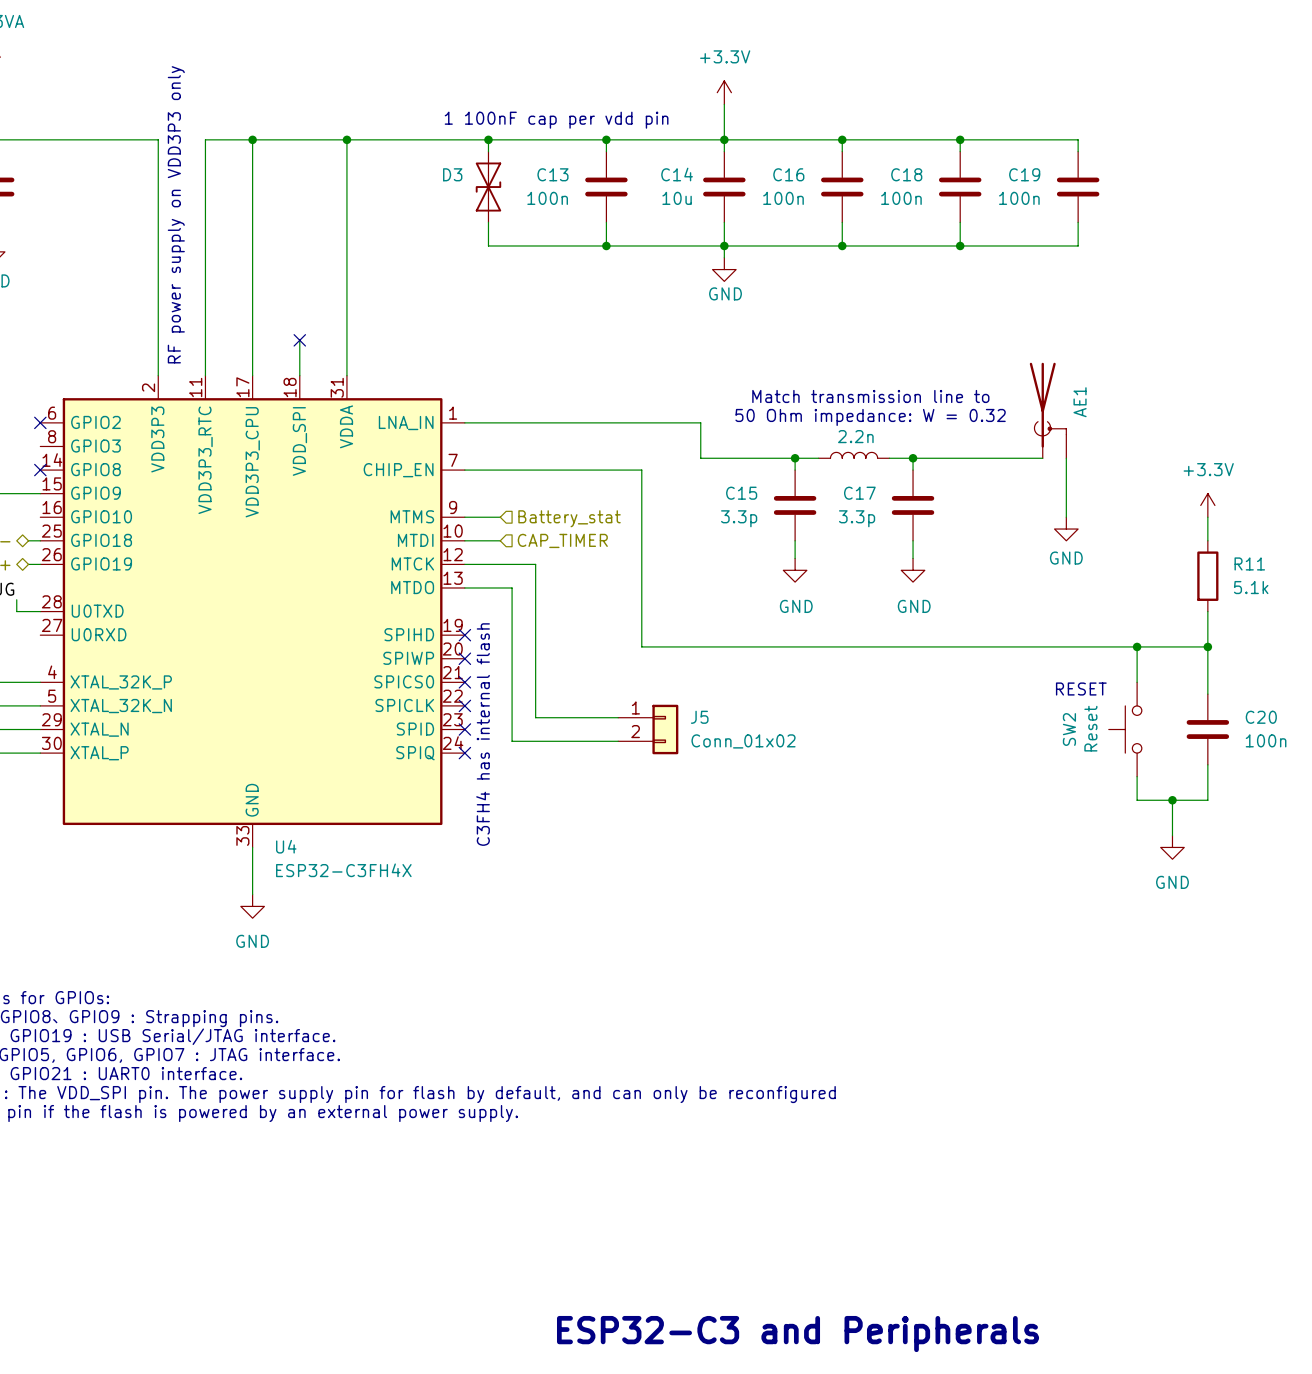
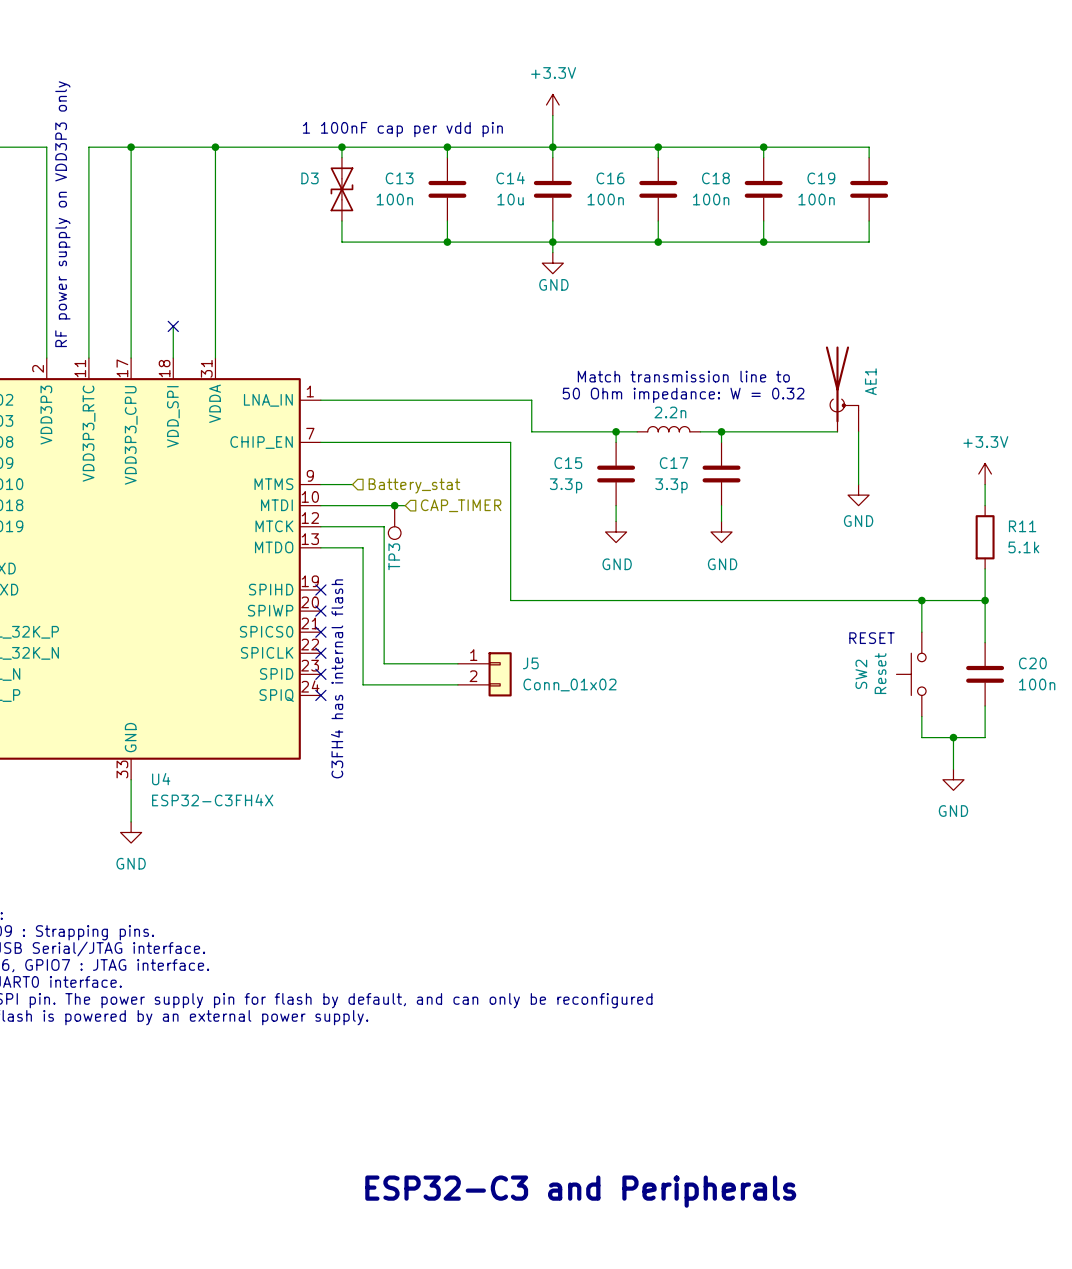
wire: (641, 470) (641, 646) (677, 646) -> (479, 442) (510, 442) (510, 600)
wire: none -> (352, 505) (405, 505)
junction: none -> (394, 505)
hierarchical label position: CAP_TIMER (562, 540) -> CAP_TIMER (461, 505)
TP3: none -> (394, 522)
text position: ESP32-C3 and Peripherals (798, 1334) -> ESP32-C3 and Peripherals (580, 1191)

